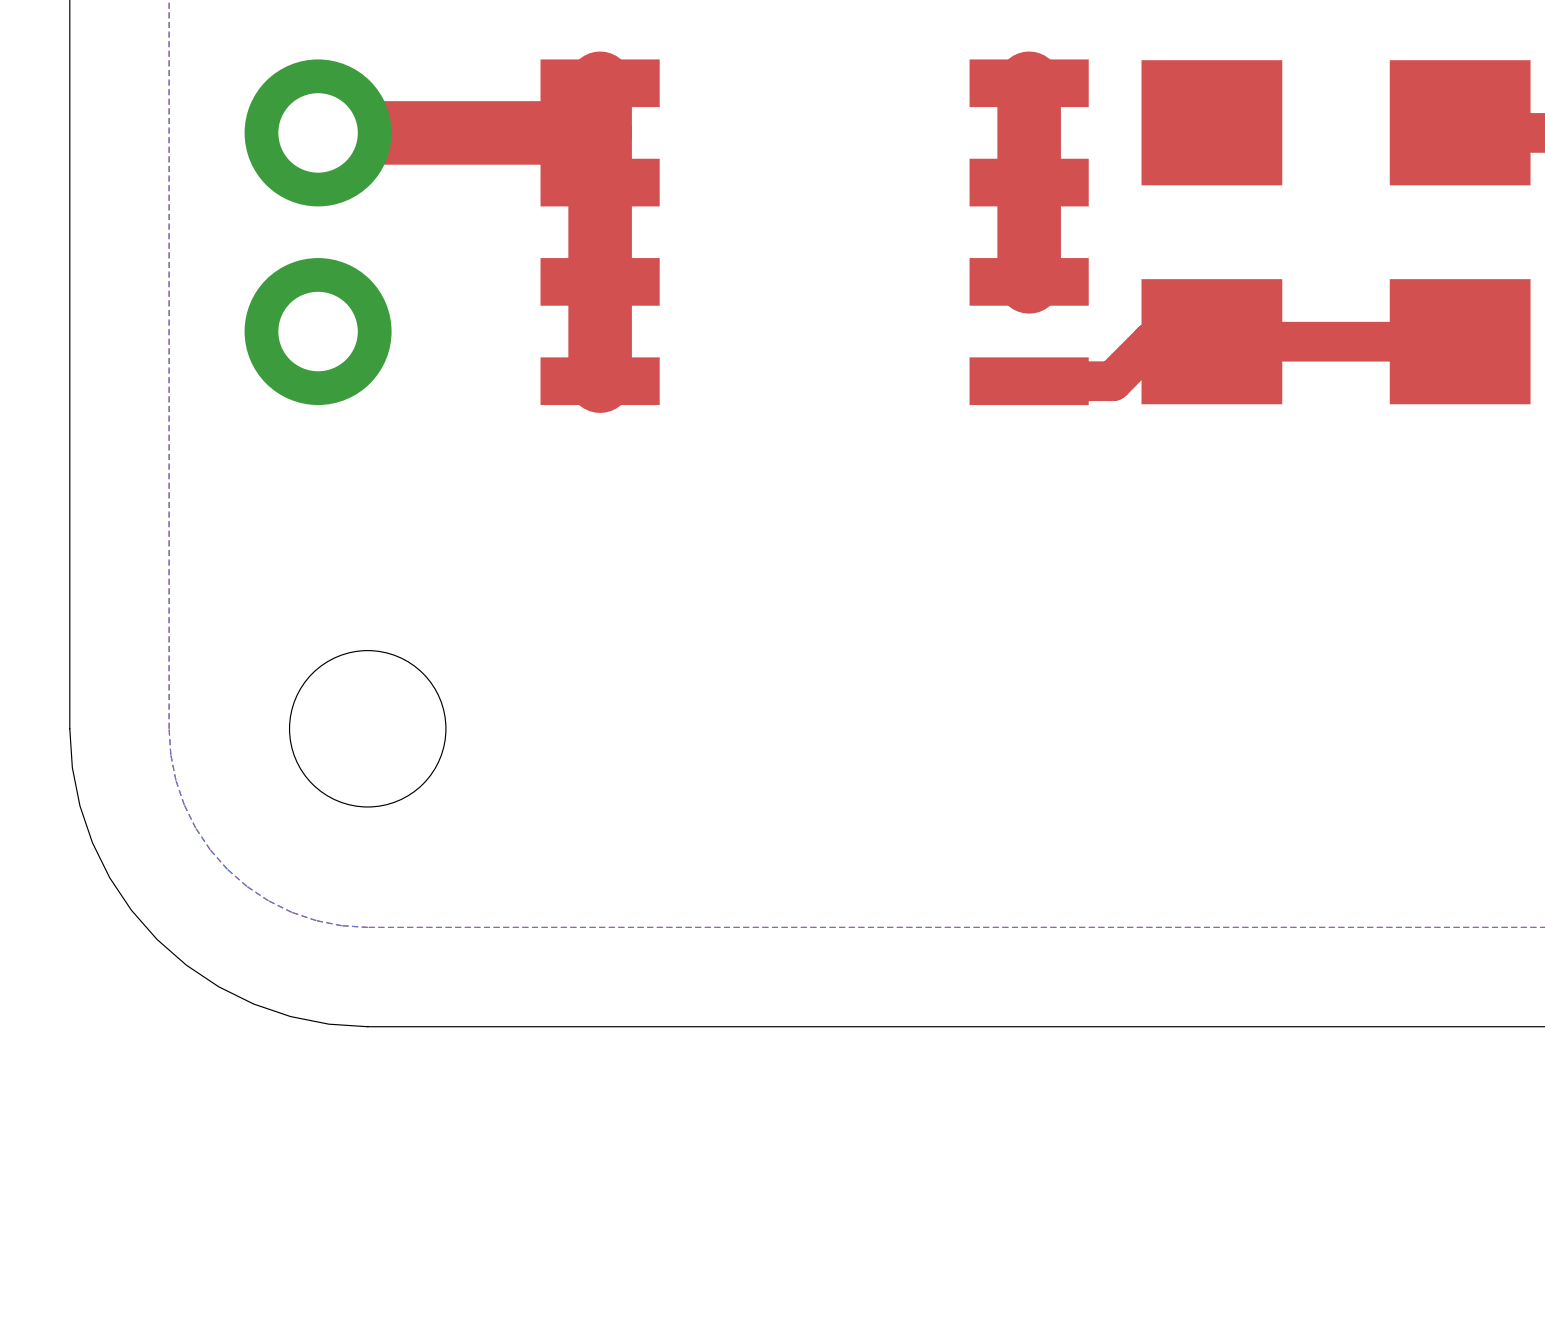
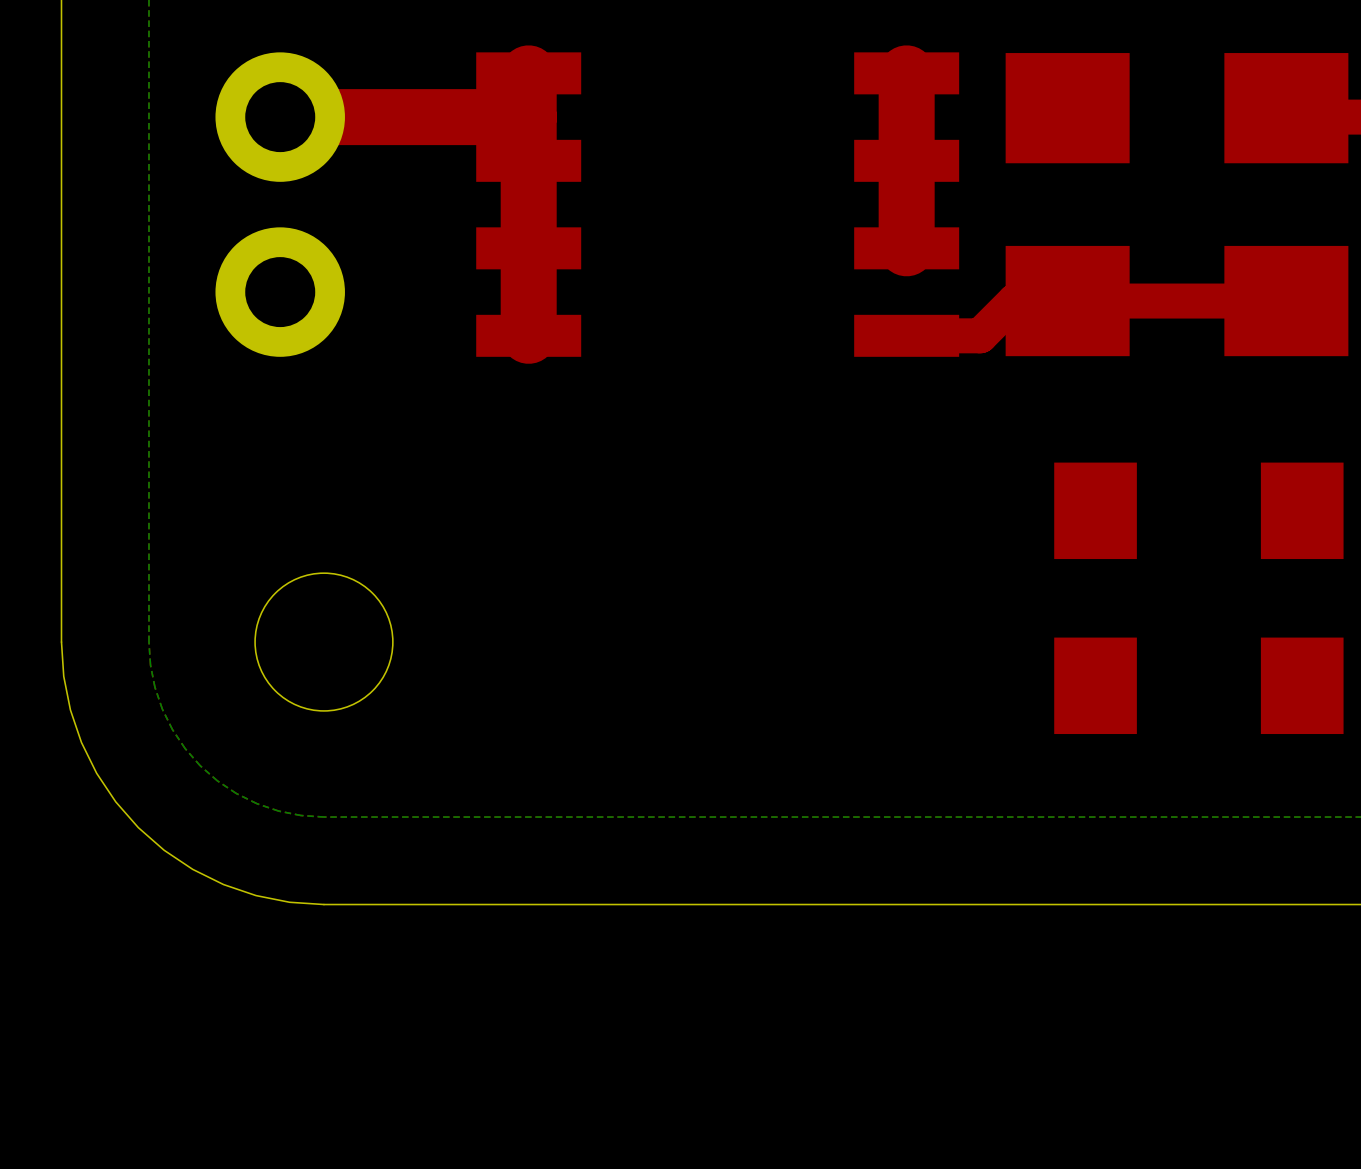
part: none -> (1198, 510)
part: none -> (1198, 685)

